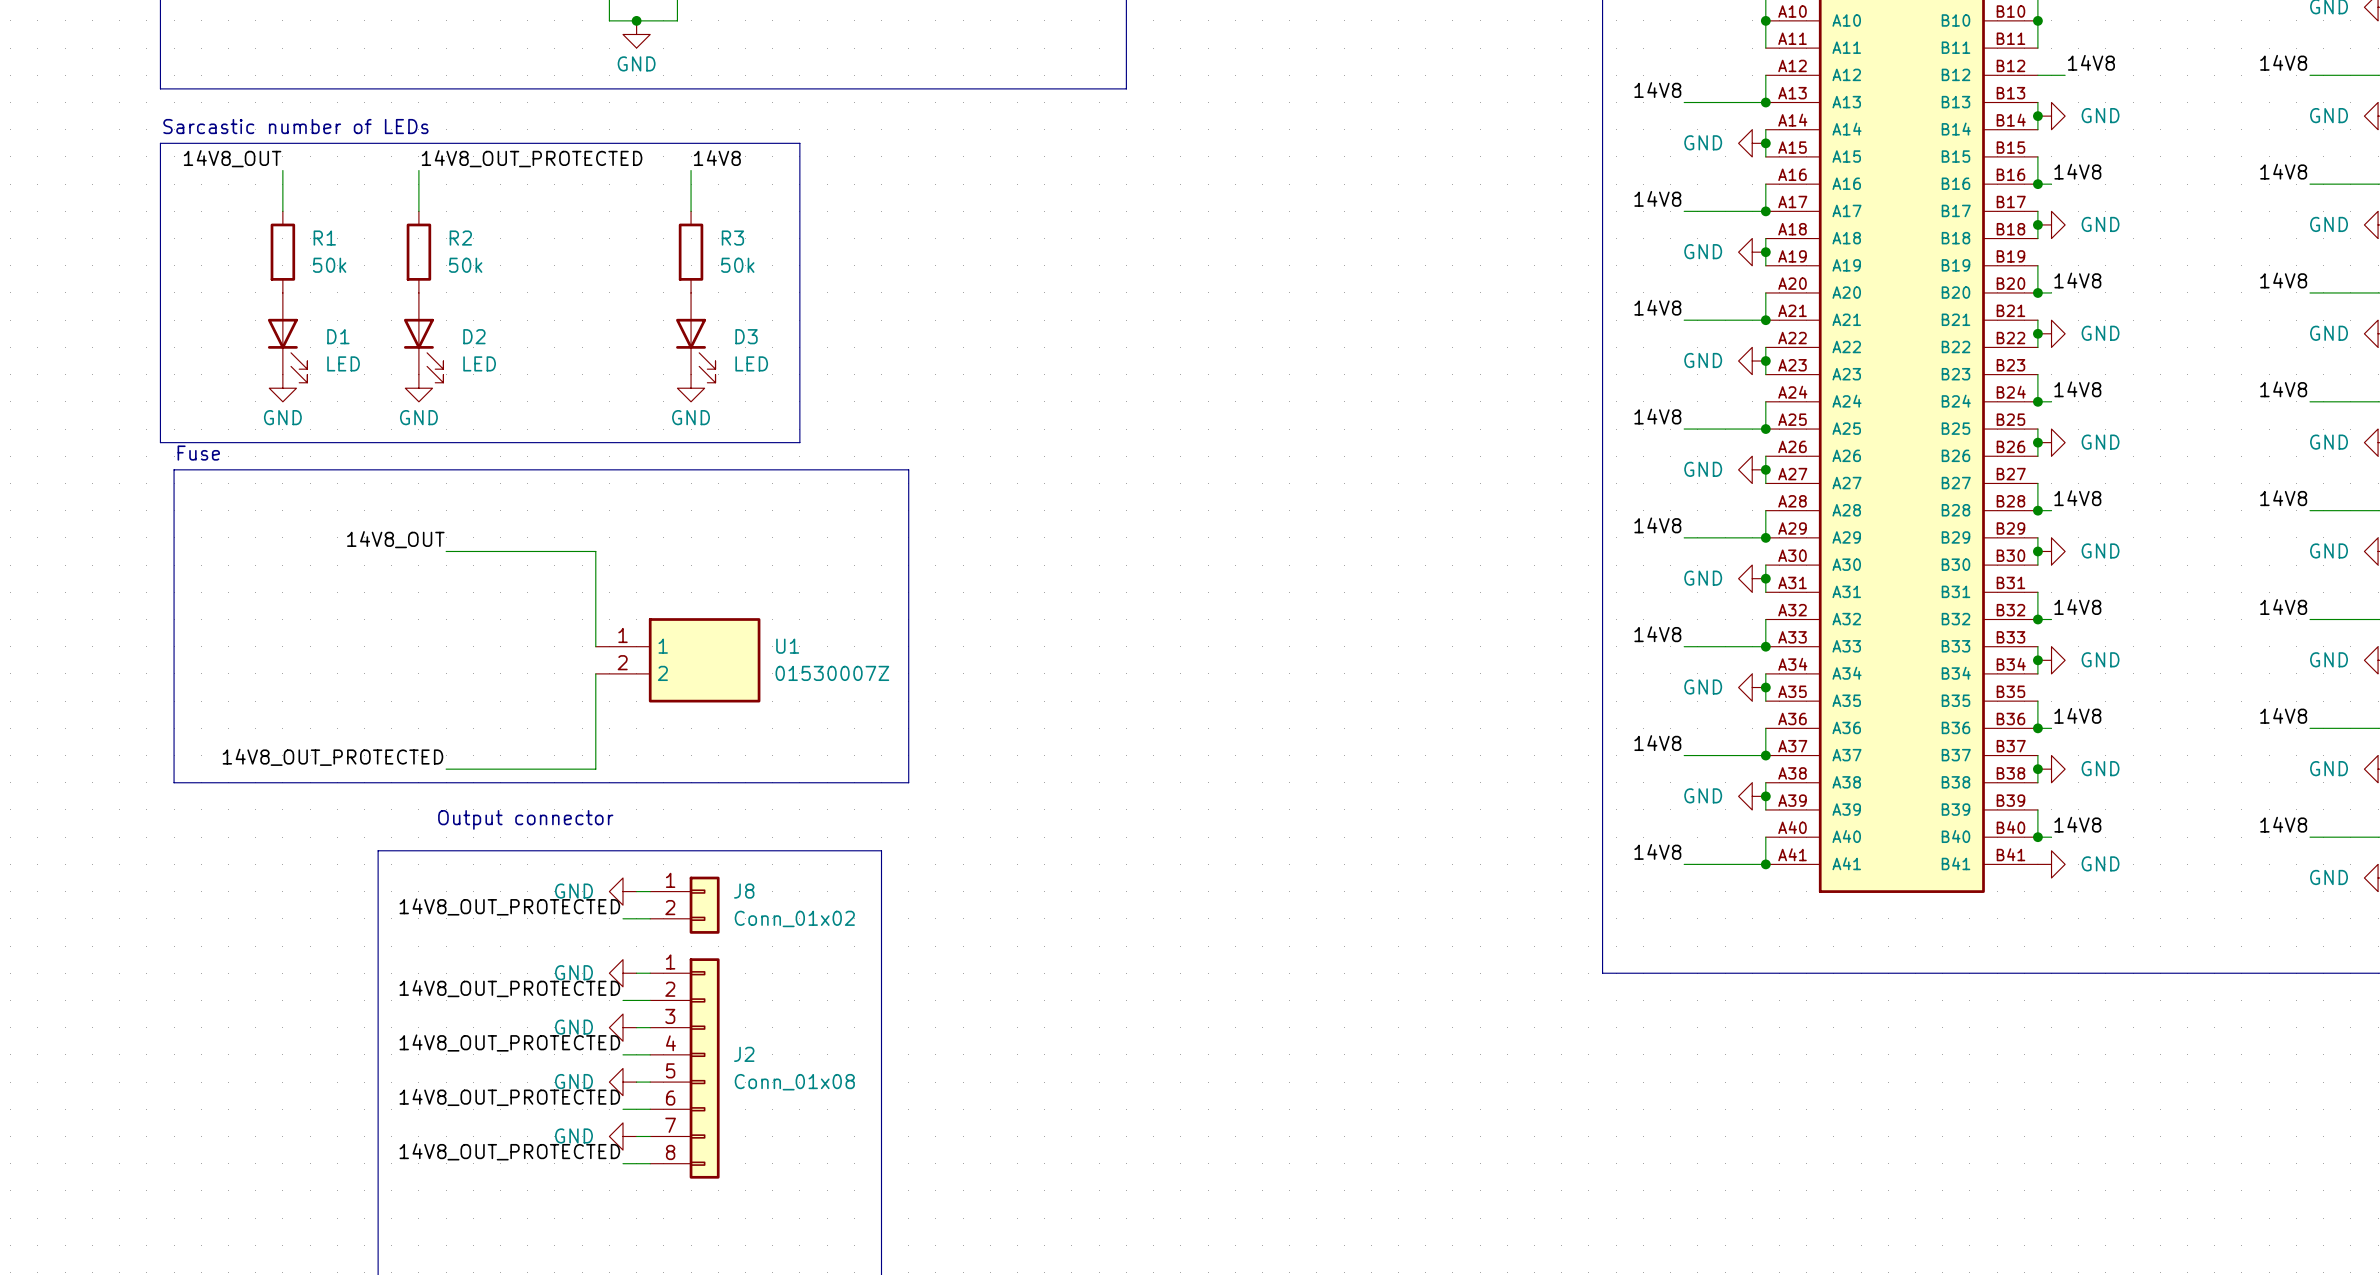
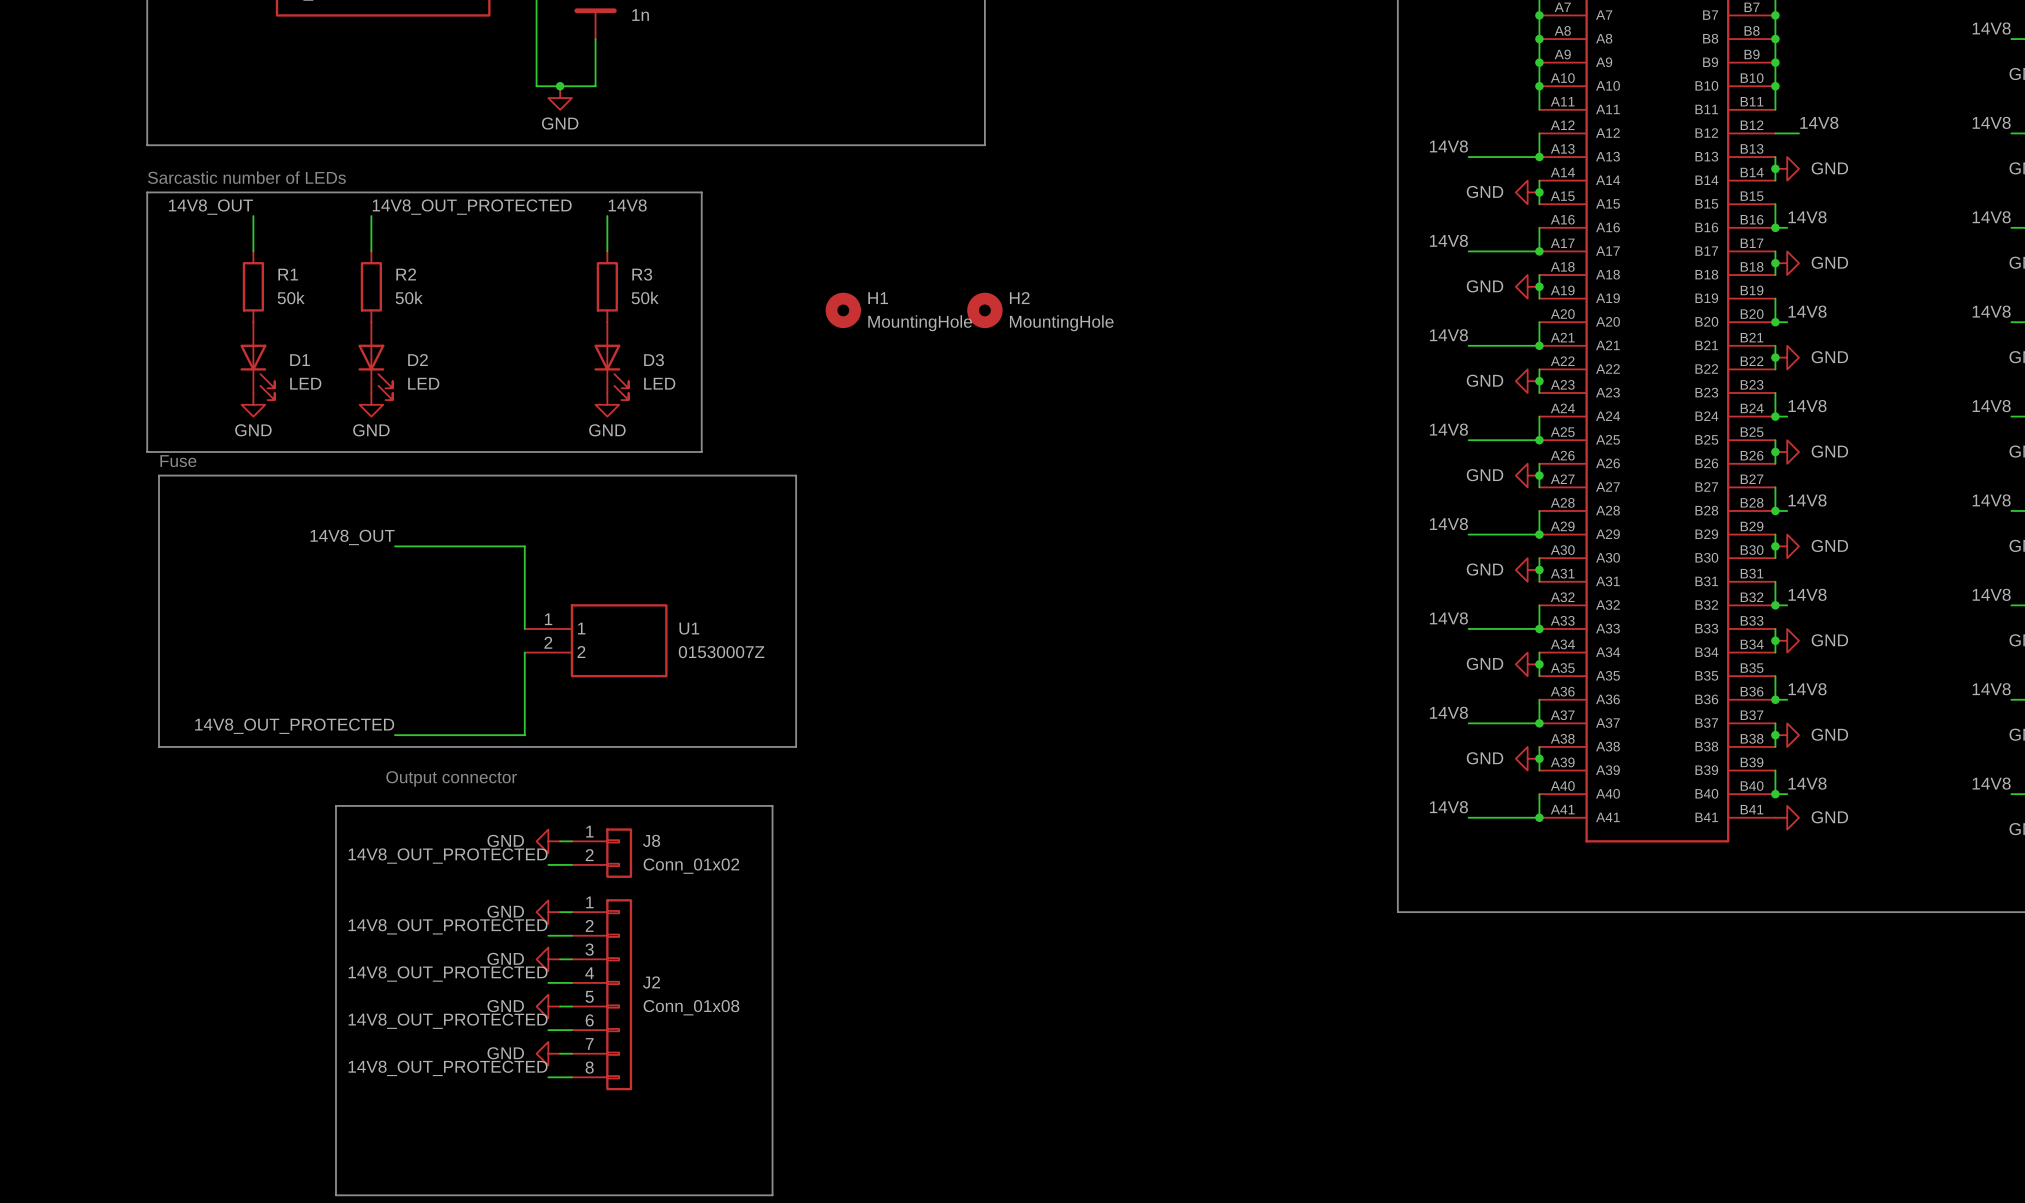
H1: none -> MountingHole (843, 310)
H2: none -> MountingHole (984, 310)

